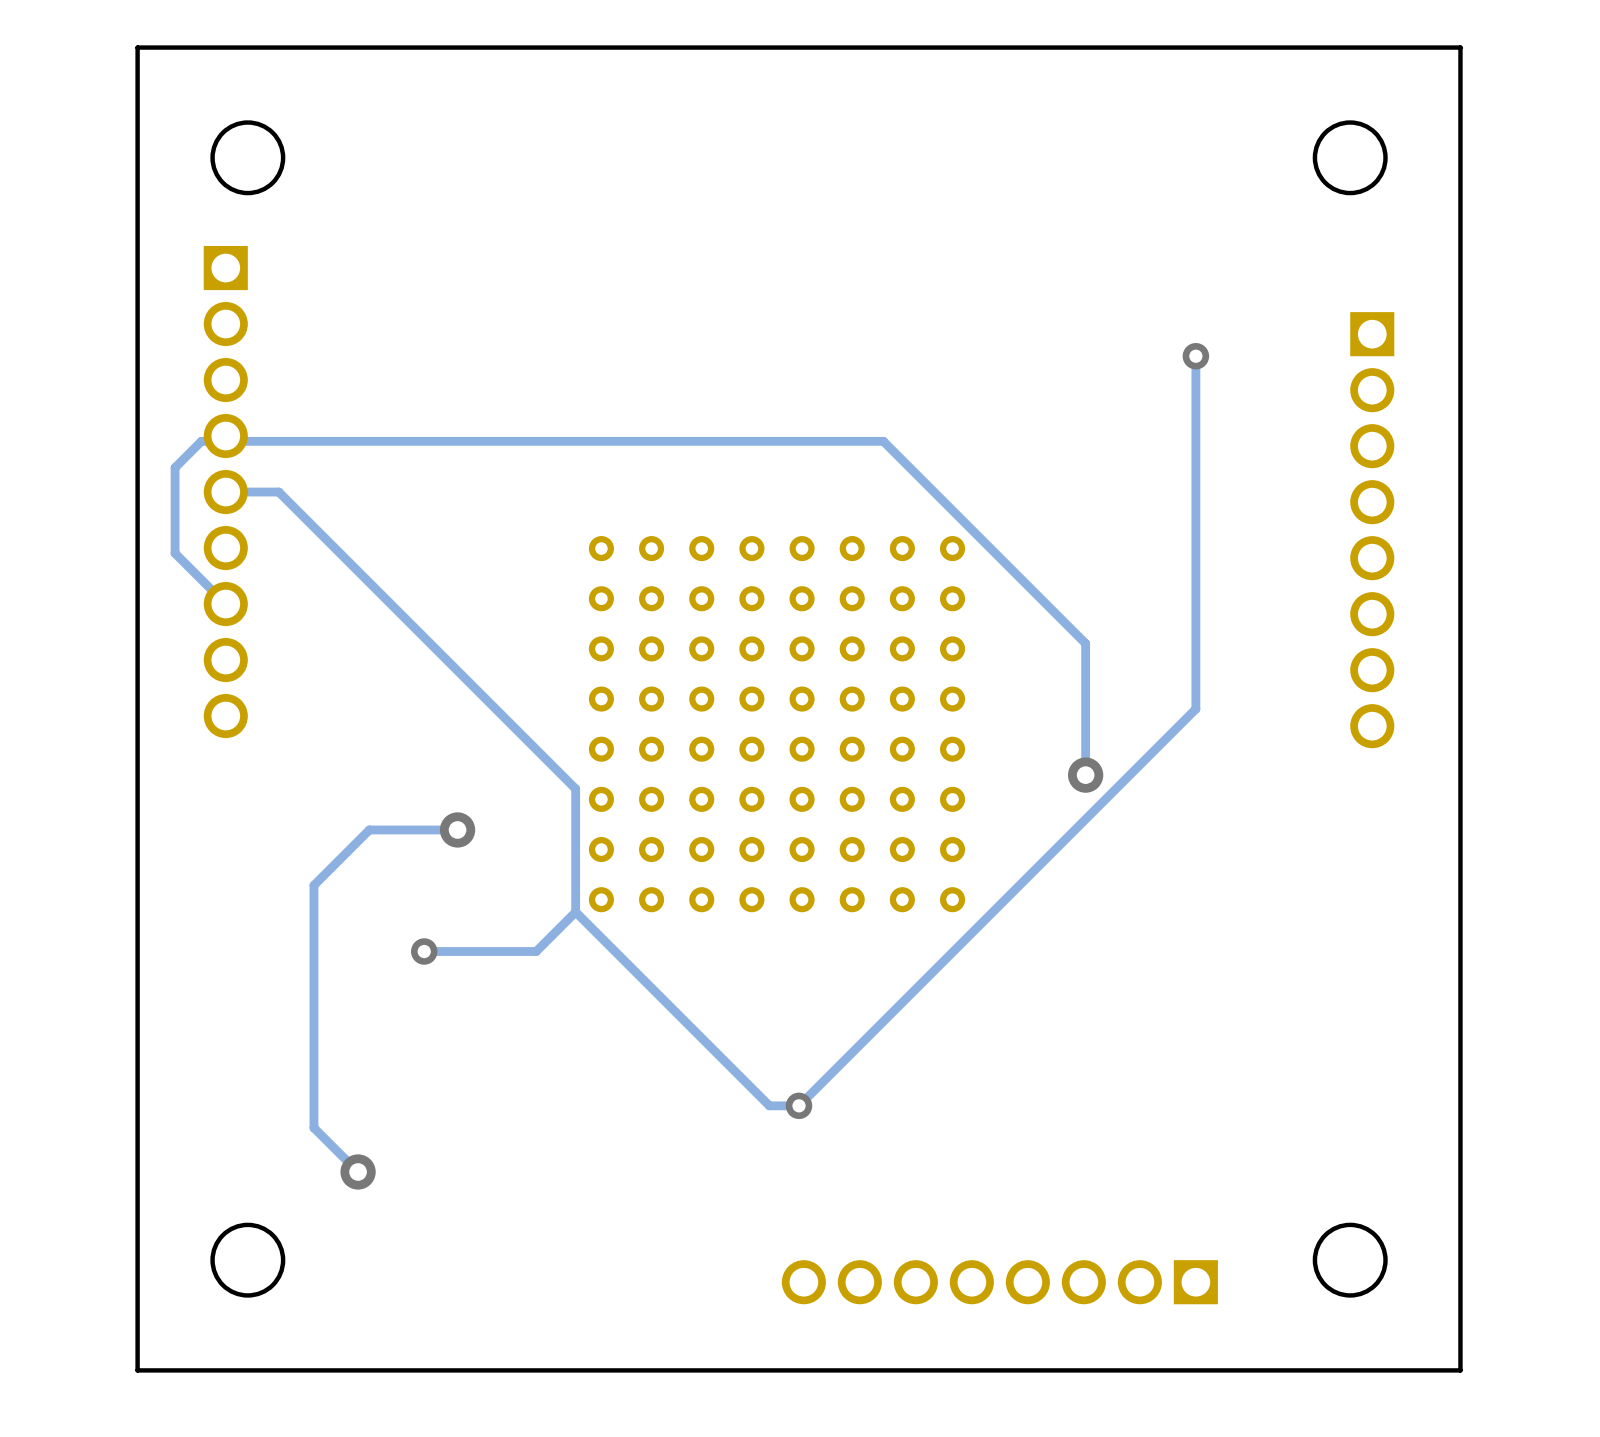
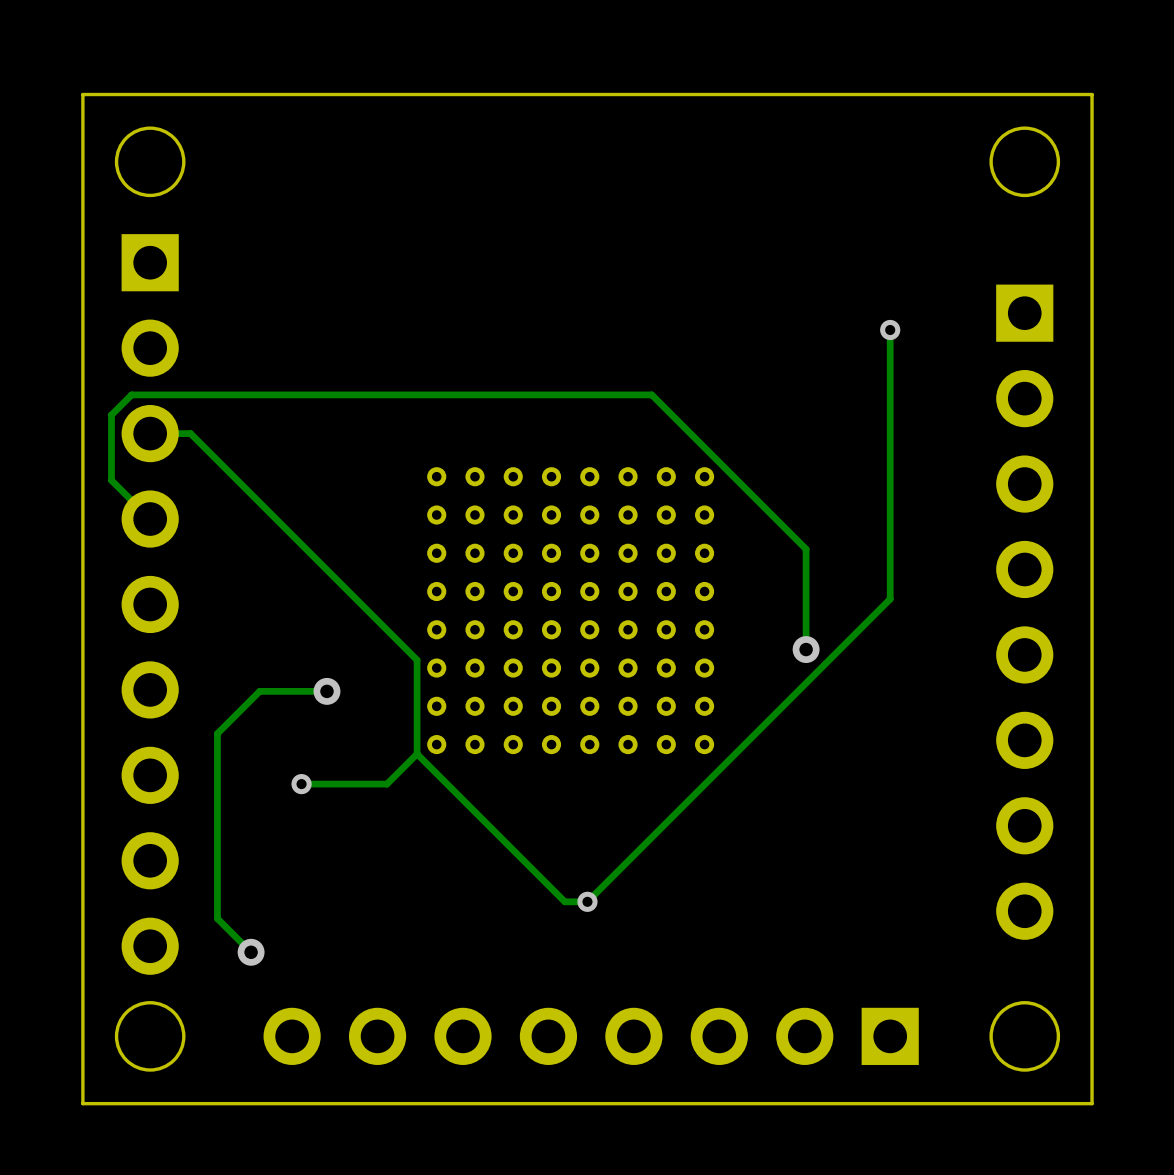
round board edge size: [210, 120, 286, 196] -> [114, 126, 186, 198]
round board edge size: [1312, 120, 1388, 196] -> [989, 126, 1061, 198]
part: (225, 492) -> none
part: (1372, 530) -> none
part: none -> (150, 604)
part: none -> (1024, 612)
round board edge size: [210, 1222, 286, 1298] -> [114, 1001, 186, 1072]
round board edge size: [1312, 1222, 1388, 1298] -> [989, 1001, 1061, 1072]
part: none -> (591, 1036)
part: (999, 1282) -> none

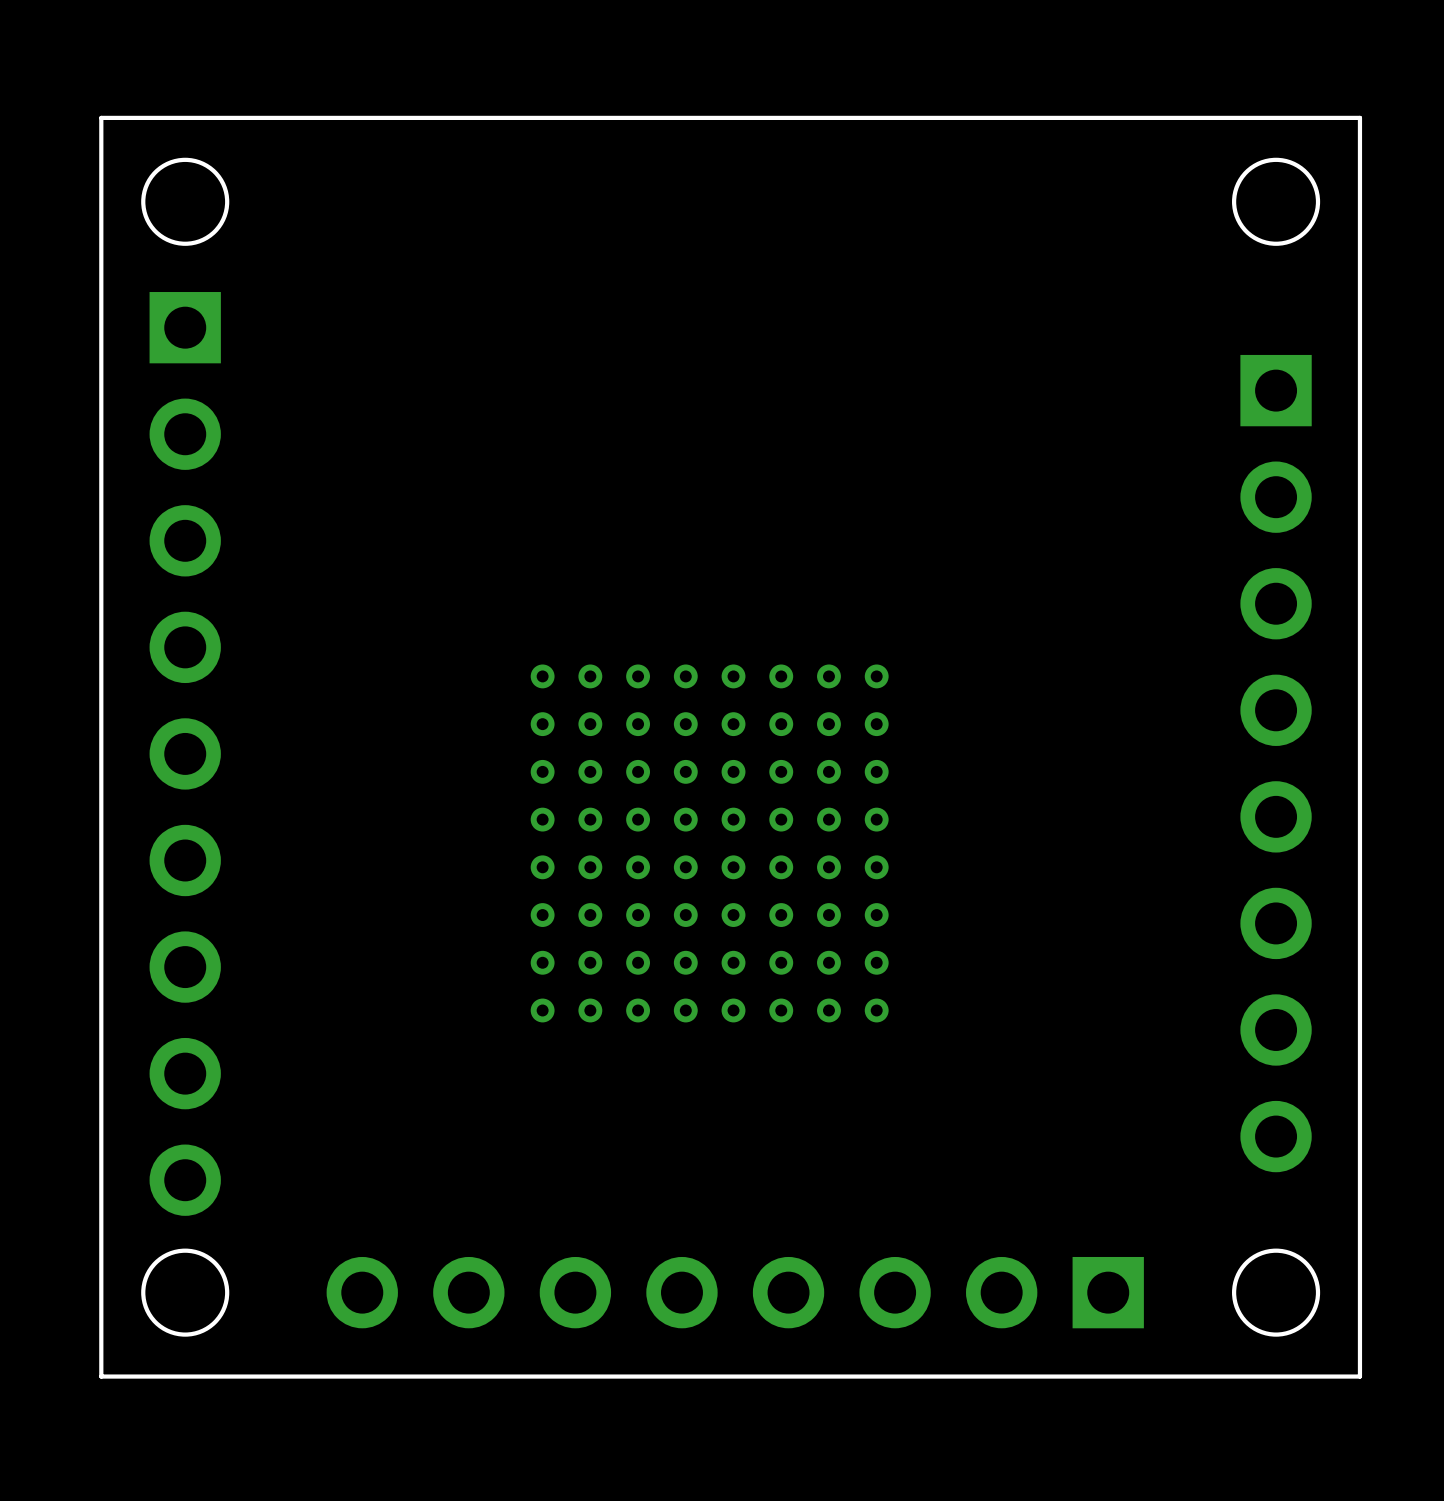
track: (890, 329) (890, 599) (587, 901) (564, 901) (417, 754) -> none
via: (890, 329) -> none
track: (150, 433) (190, 433) (417, 660) (417, 754) -> none
track: (150, 519) (111, 480) (111, 415) (131, 394) (651, 394) (806, 549) (806, 649) -> none
part position: (570, 610) -> (709, 843)
via: (806, 649) -> none
track: (326, 691) (259, 691) (217, 733) (217, 918) (251, 952) -> none
via: (326, 691) -> none
track: (417, 754) (386, 784) (301, 784) -> none
via: (301, 784) -> none
via: (587, 901) -> none
via: (251, 952) -> none

